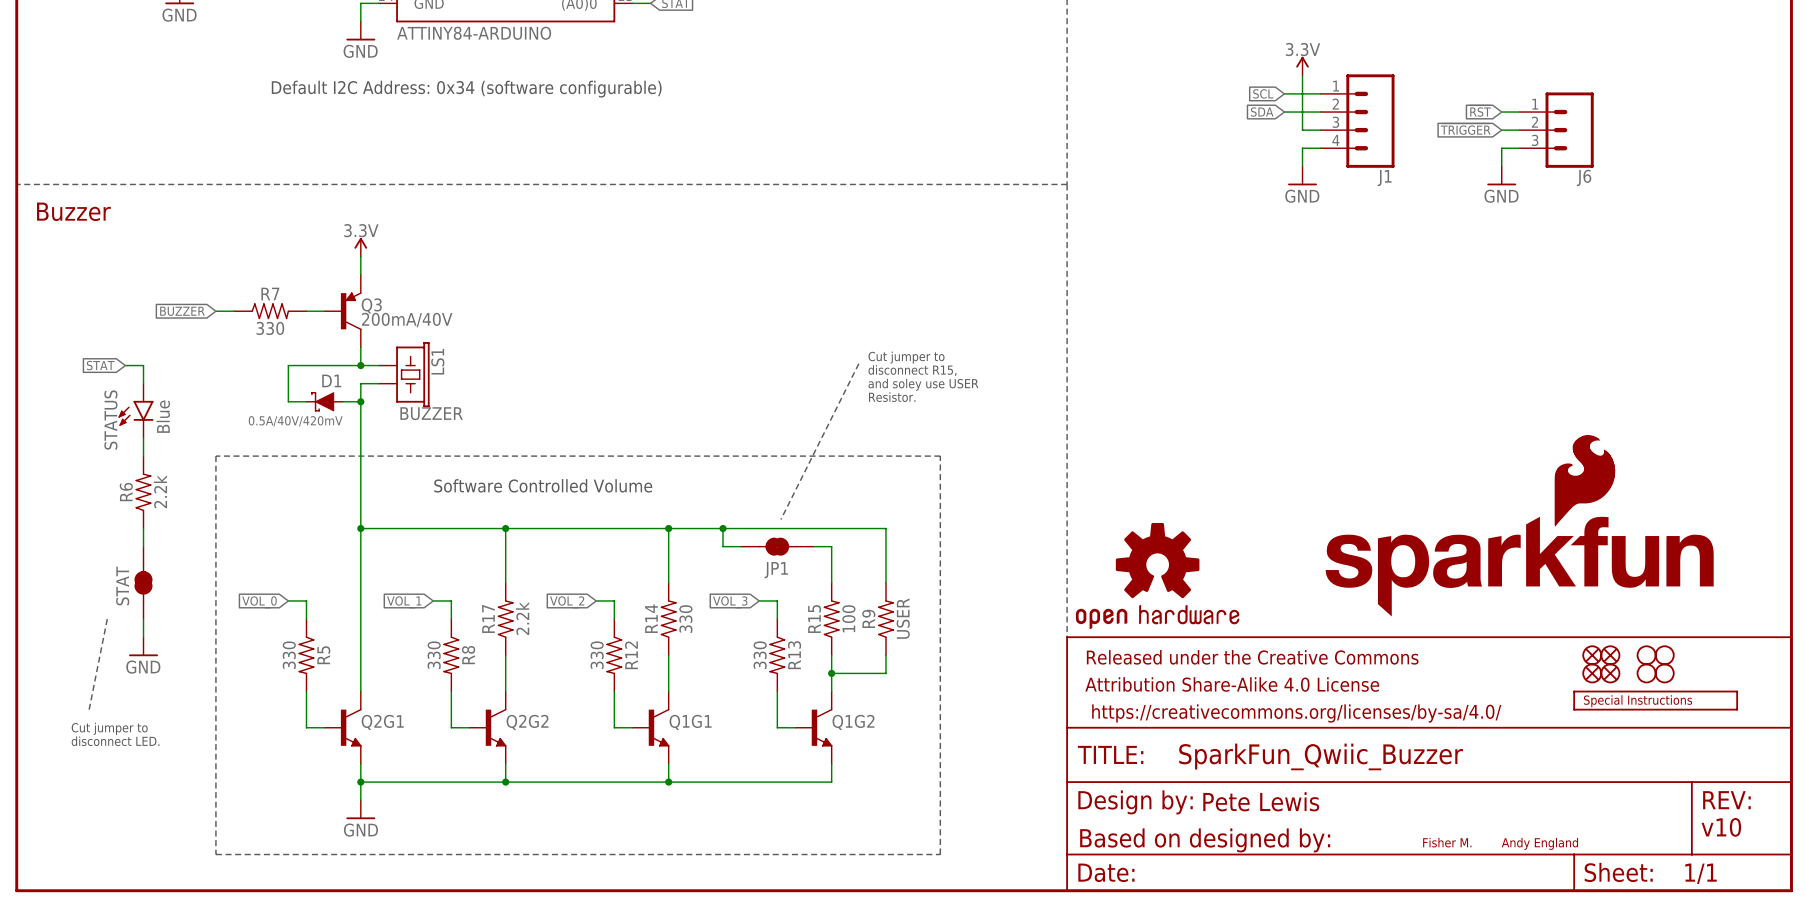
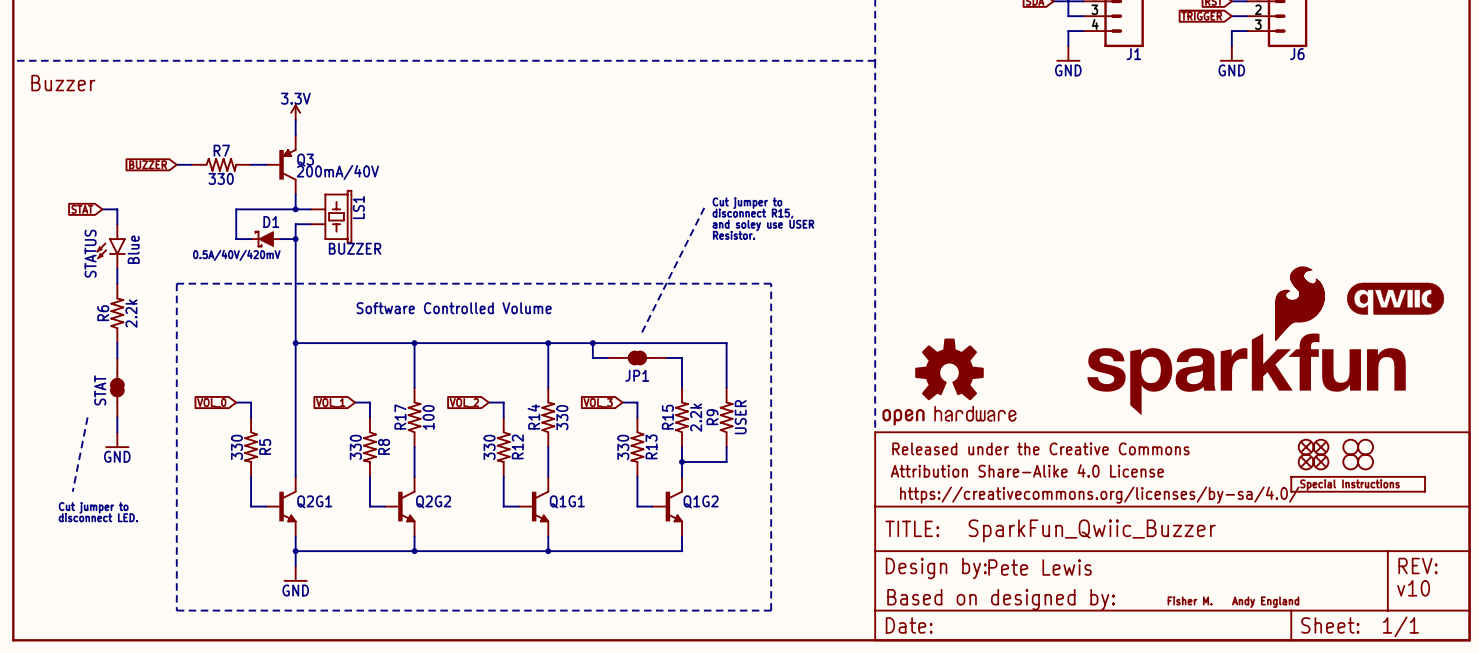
part: none -> (1395, 298)
R17 value: 2.2k (522, 618) -> 100 (428, 417)
R15 value: 100 (848, 618) -> 2.2k (696, 417)

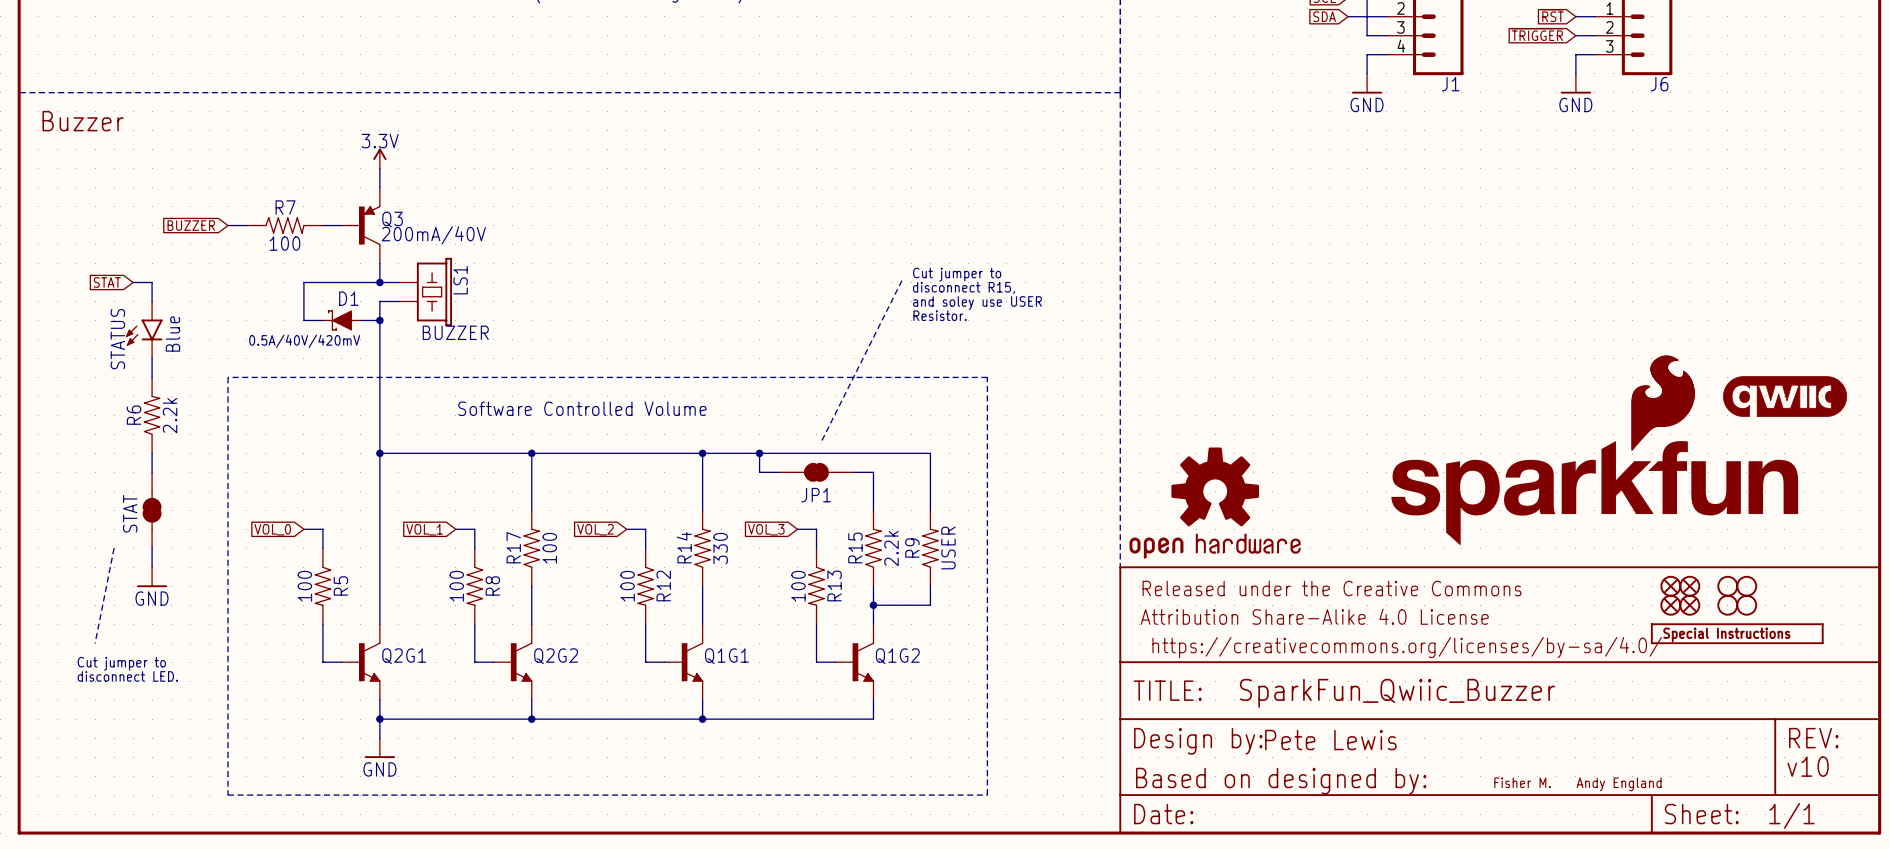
R7 value: 330 (221, 178) -> 100 (284, 243)
R5 value: 330 (236, 447) -> 100 (304, 586)
R8 value: 330 (355, 447) -> 100 (456, 586)
R12 value: 330 (489, 447) -> 100 (627, 586)
R13 value: 330 (623, 447) -> 100 (798, 586)

